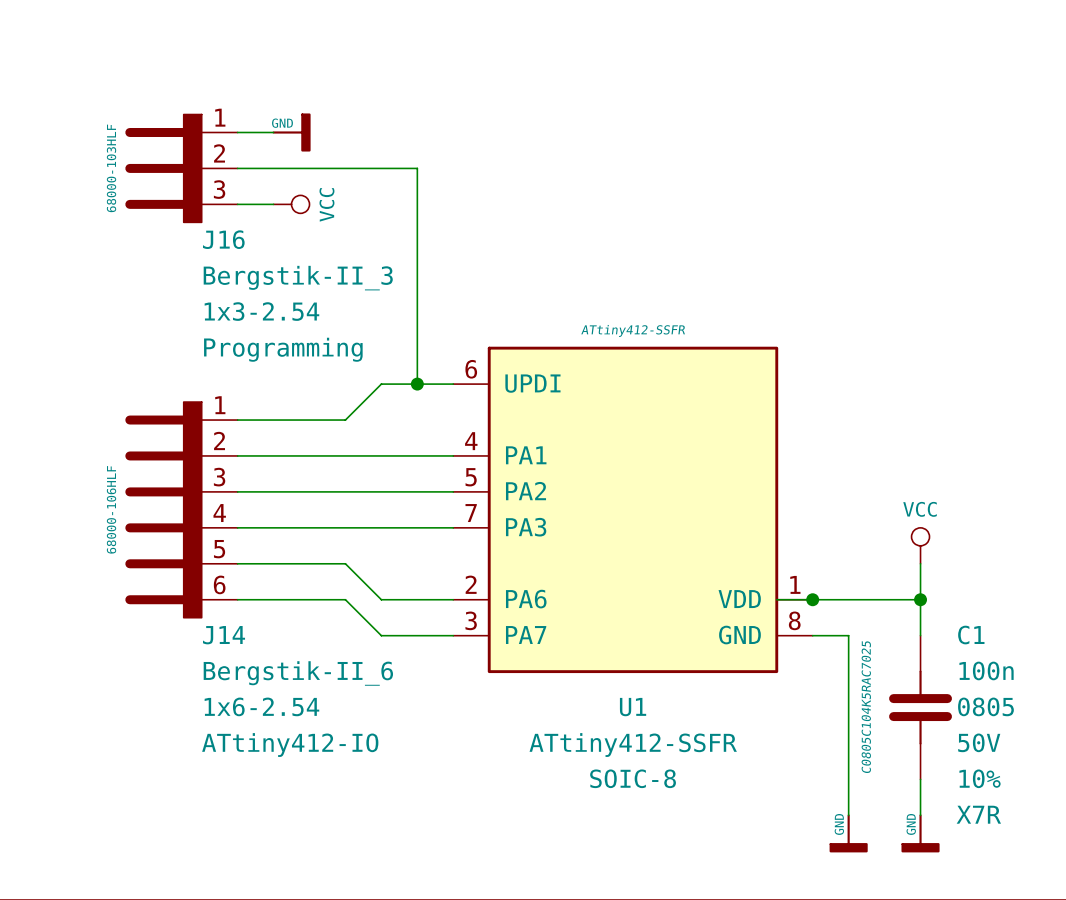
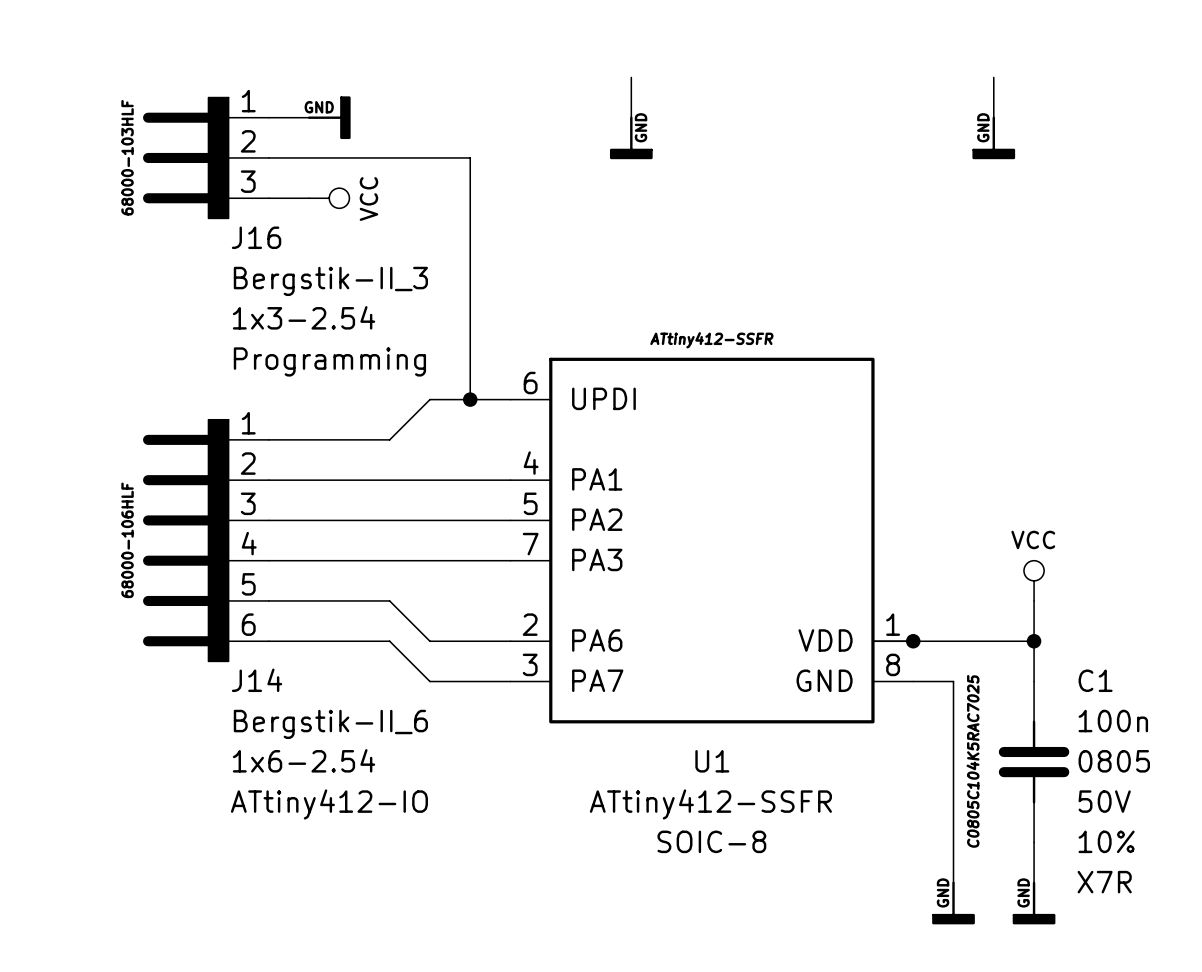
wire: none -> (631, 77) (631, 117)
wire: none -> (993, 77) (993, 117)
power symbol: none -> GND (631, 137)
power symbol: none -> GND (993, 137)

